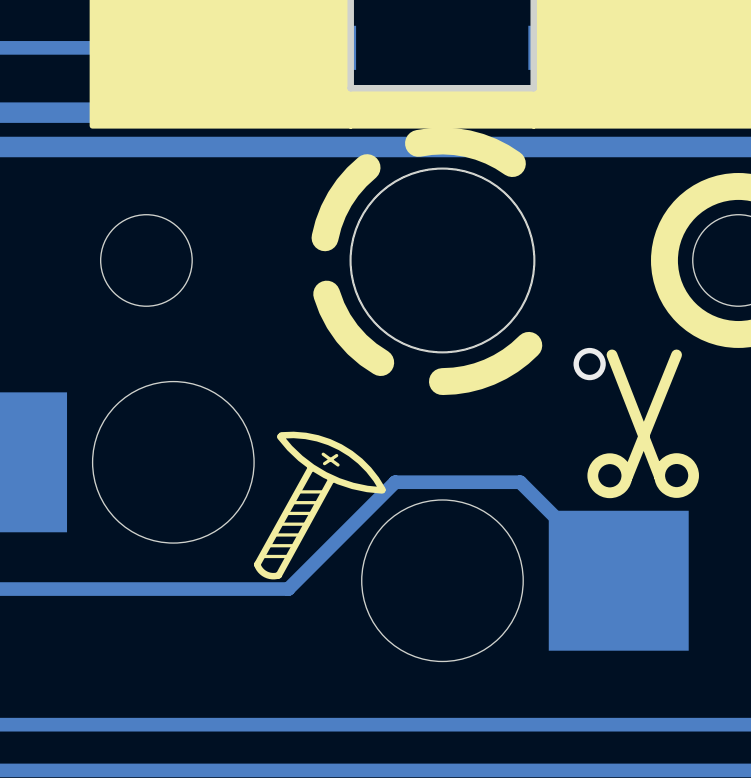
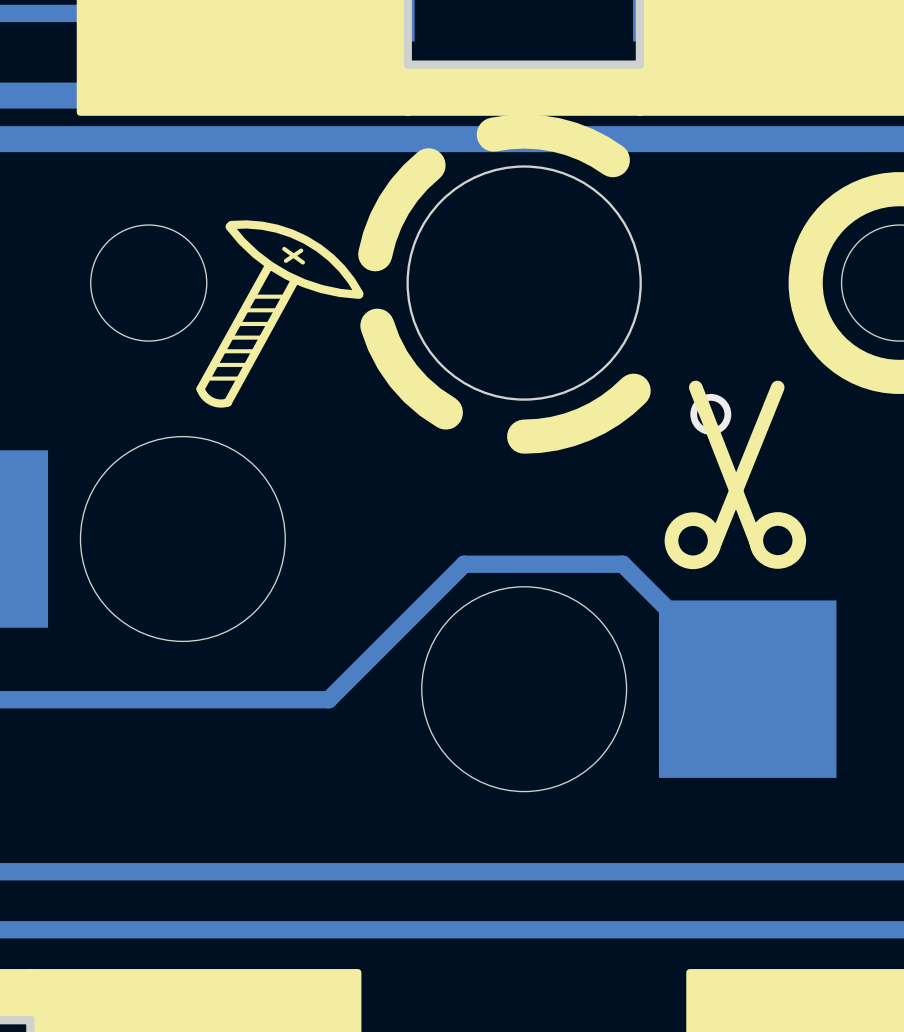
drawing position: (643, 423) -> (735, 474)
drawing position: (319, 505) -> (280, 313)

